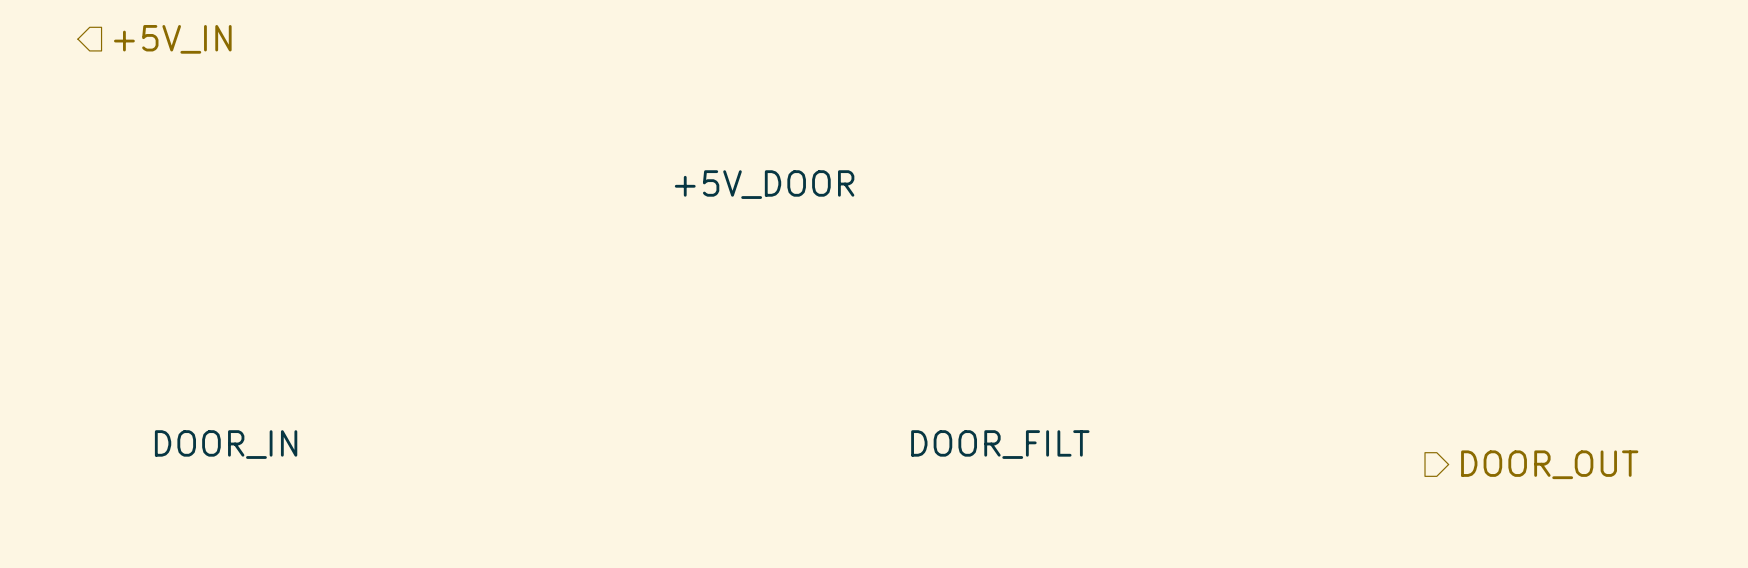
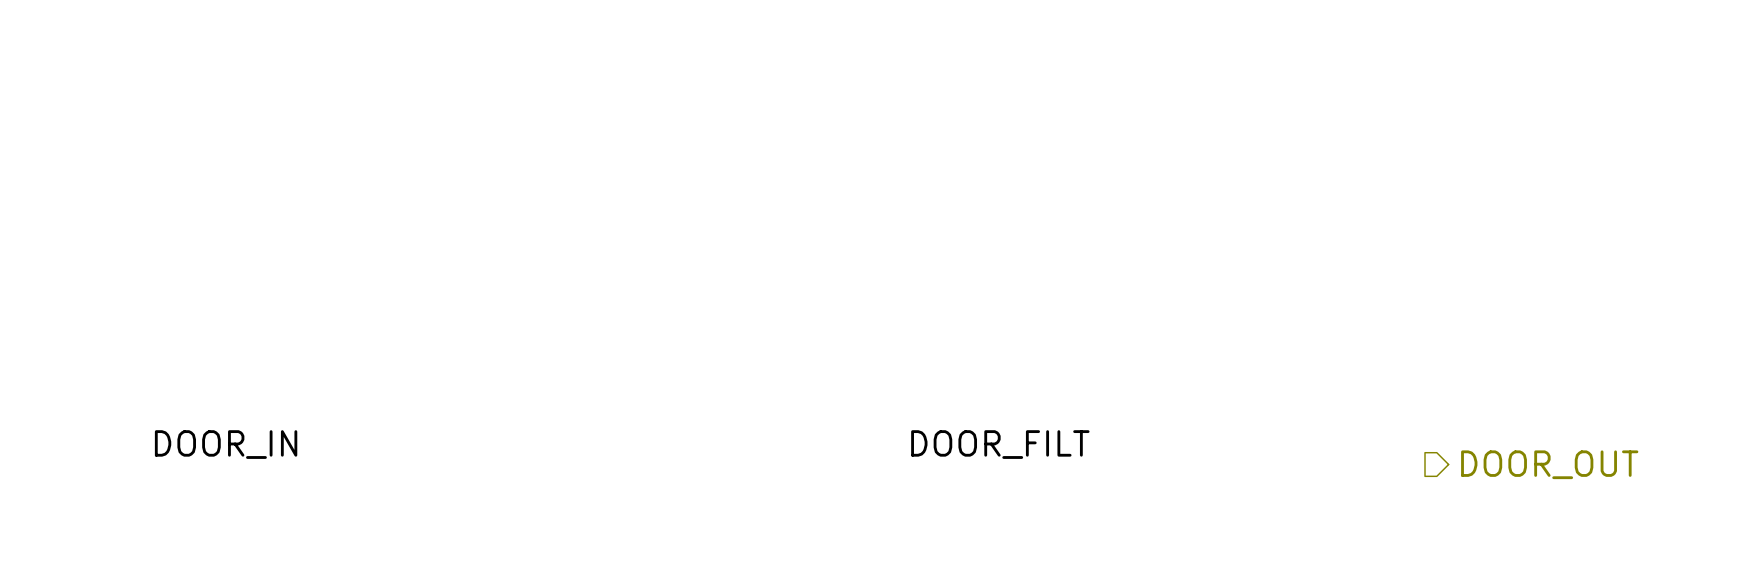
hierarchical label: +5V_IN (172, 39) -> none
label: +5V_DOOR (764, 184) -> none

